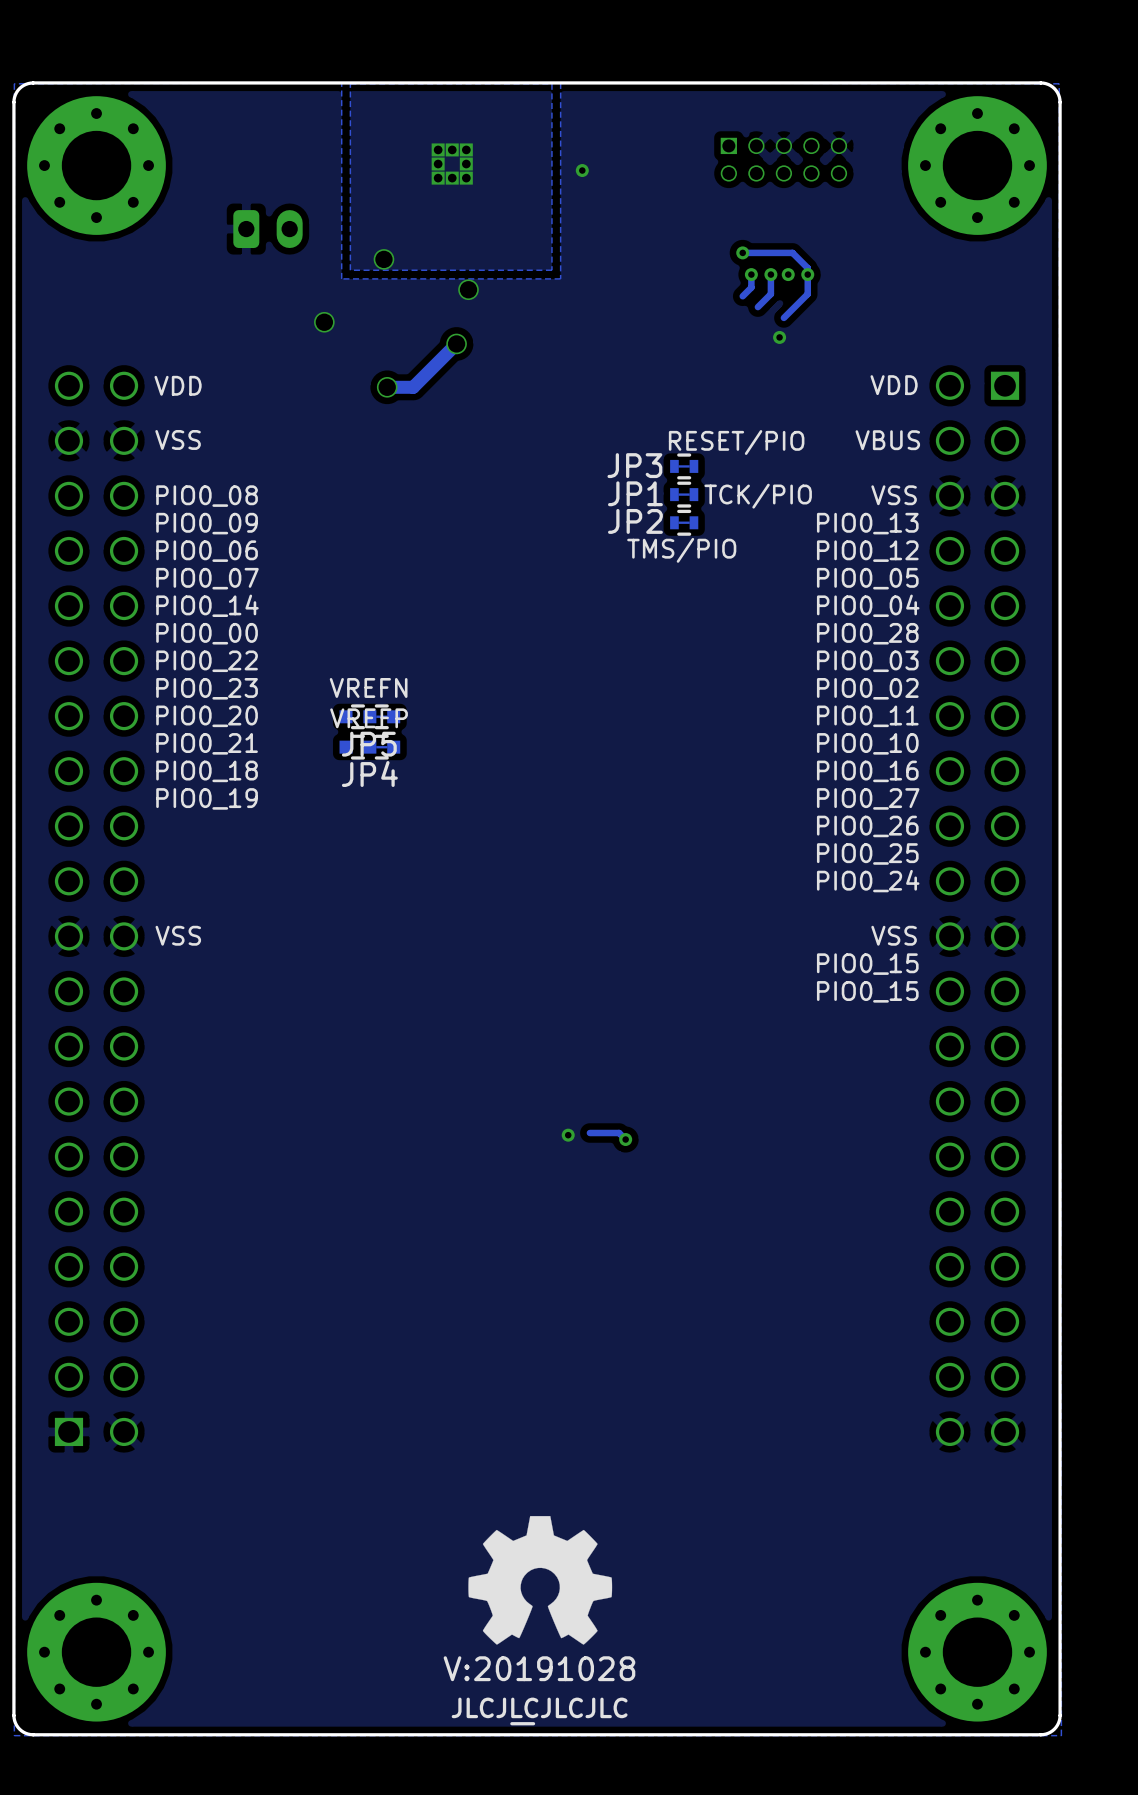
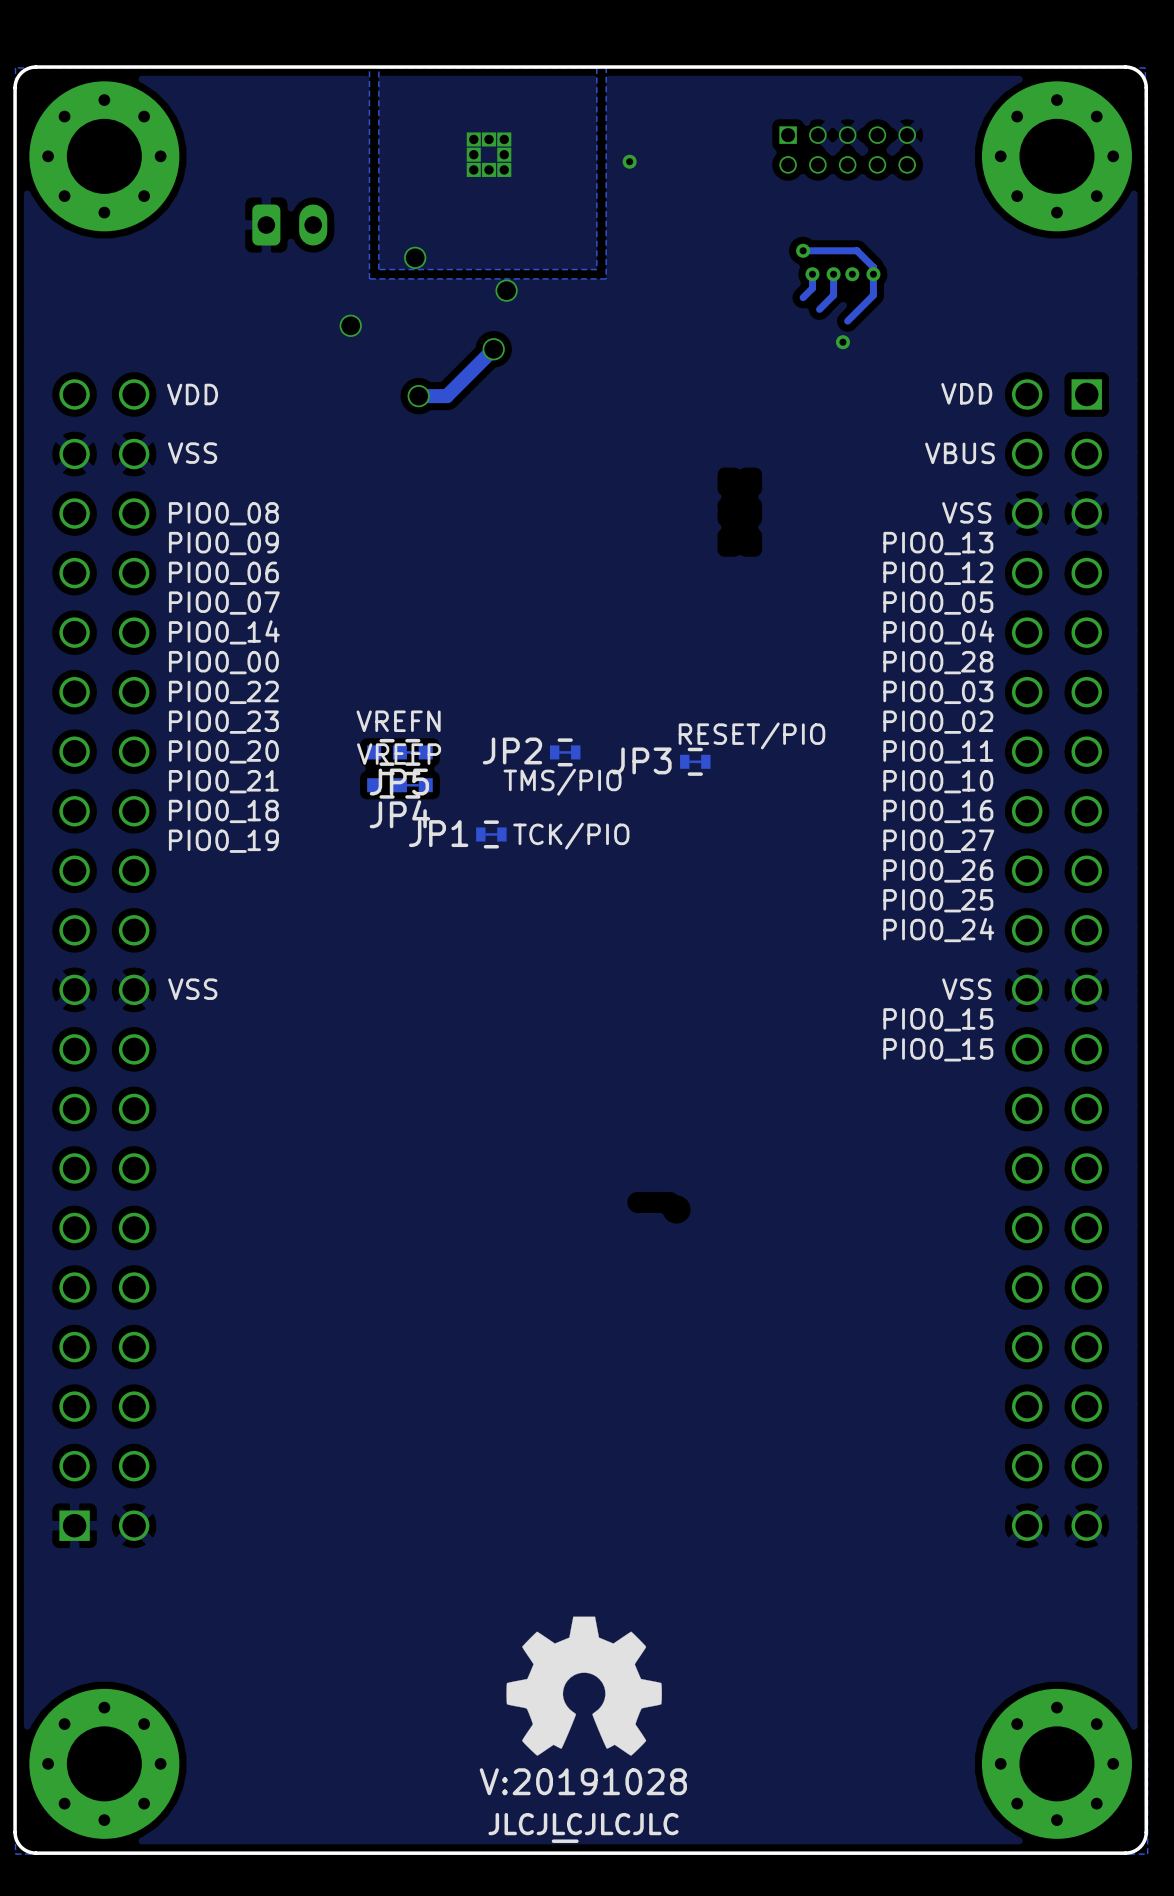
JP3 position: (684, 466) -> (695, 761)
JP1 position: (684, 494) -> (491, 834)
JP2 position: (684, 522) -> (565, 752)
track: (589, 1133) (619, 1133) (625, 1139) -> none
via: (568, 1135) -> none
via: (625, 1139) -> none

